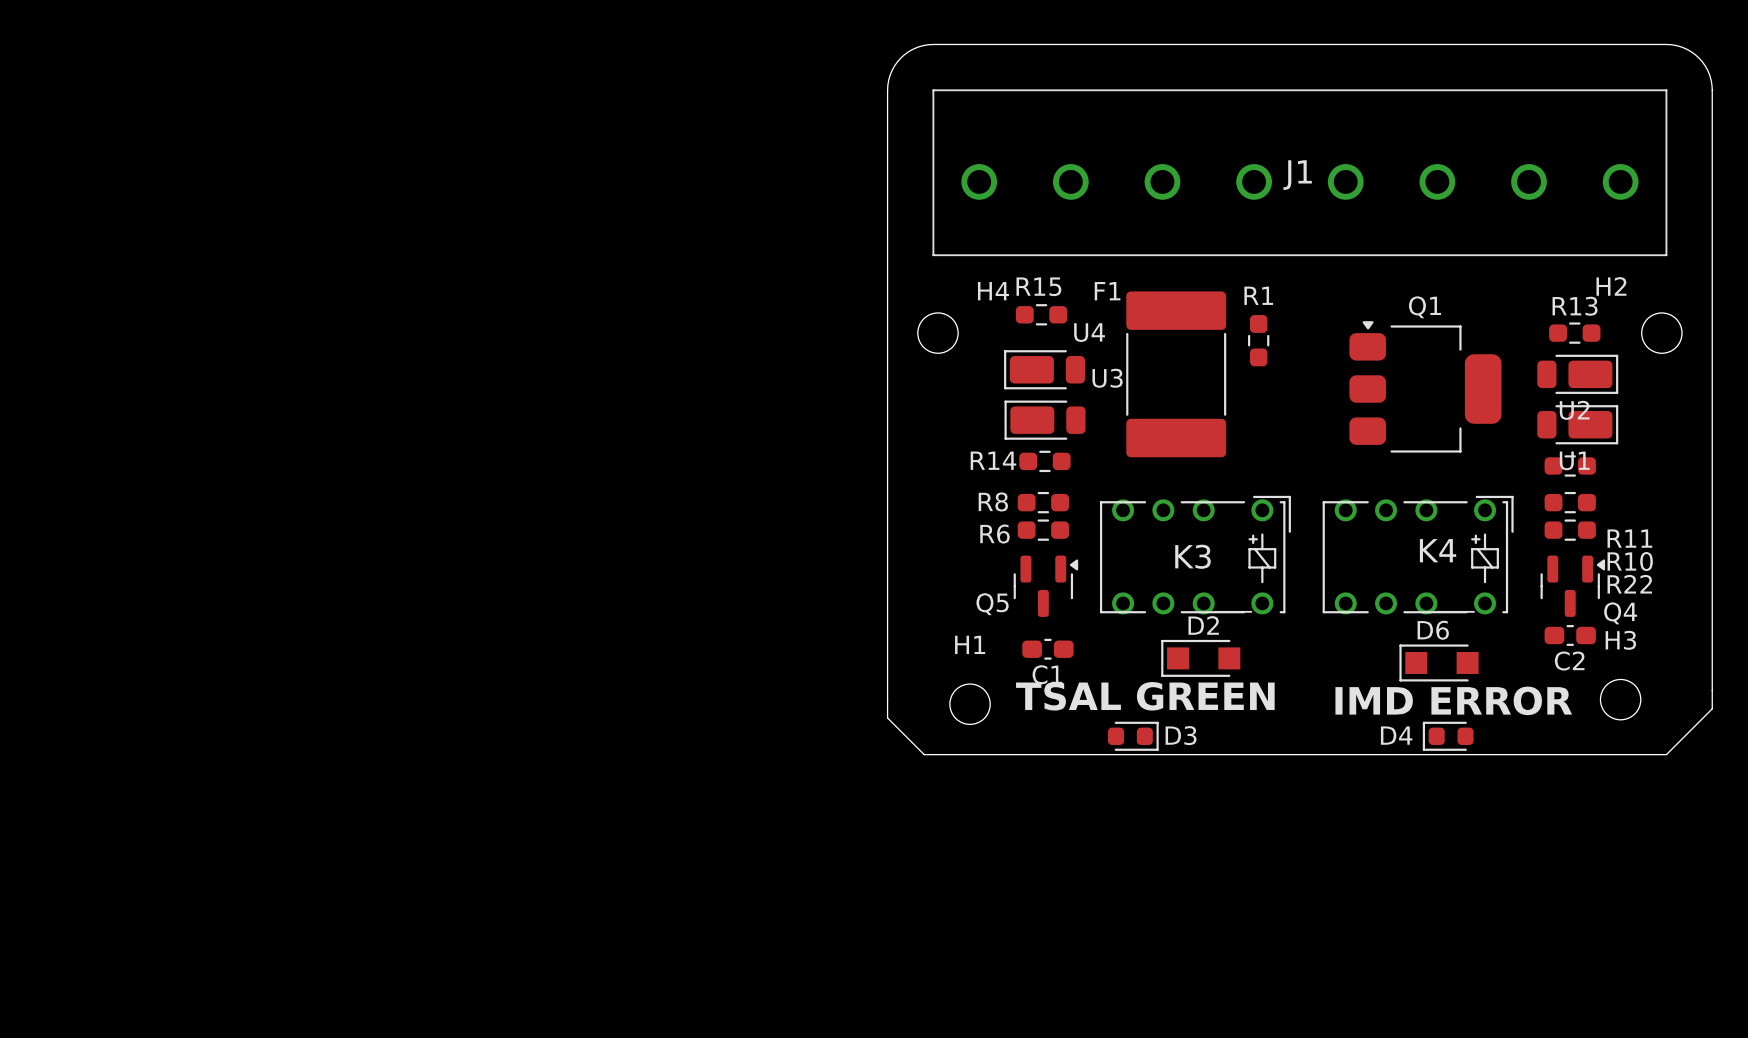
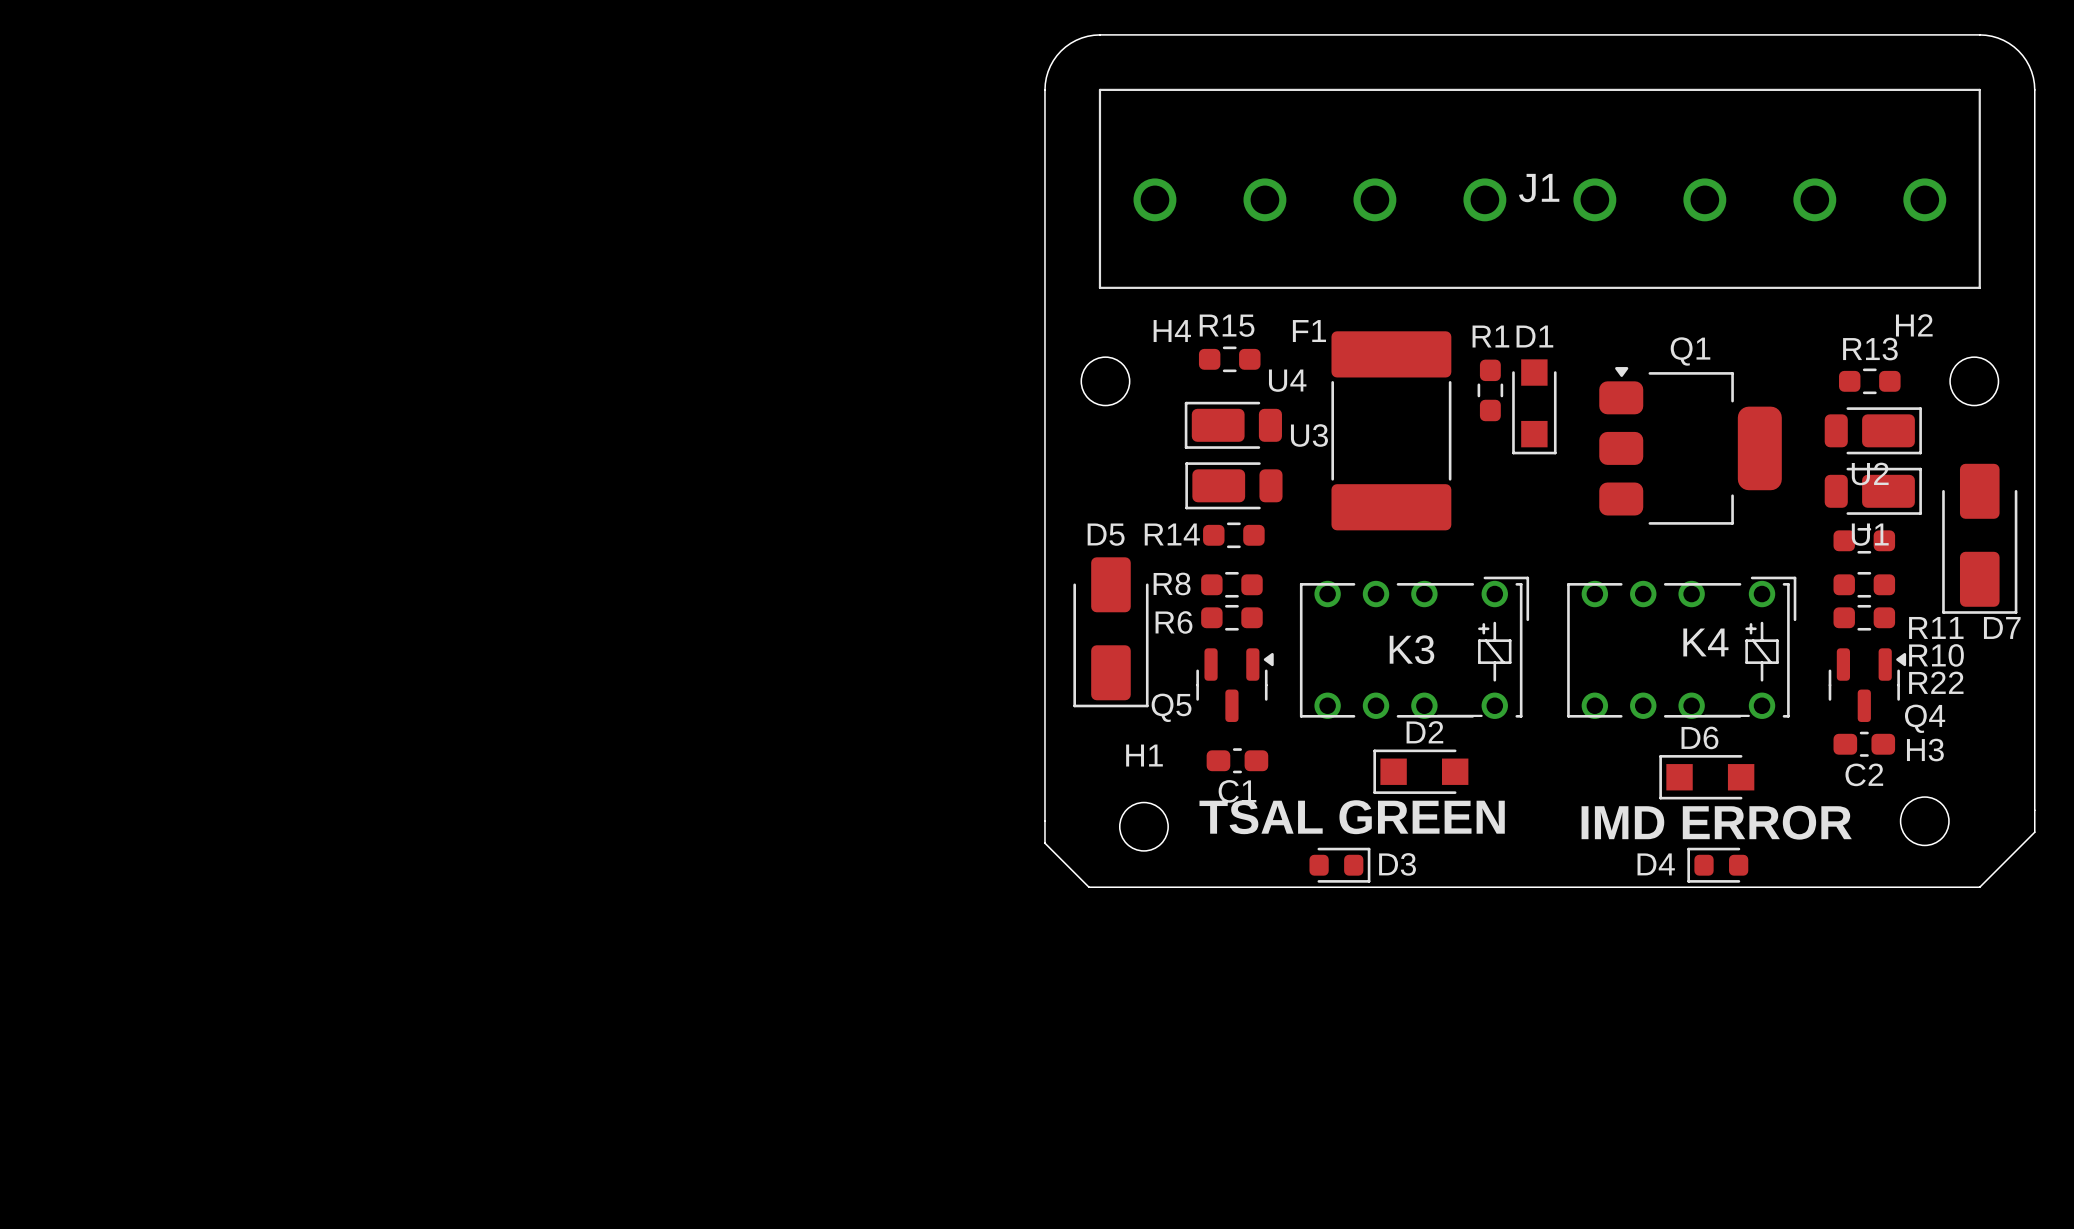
D1: none -> (1534, 406)
D7: none -> (1979, 538)
D5: none -> (1110, 632)

